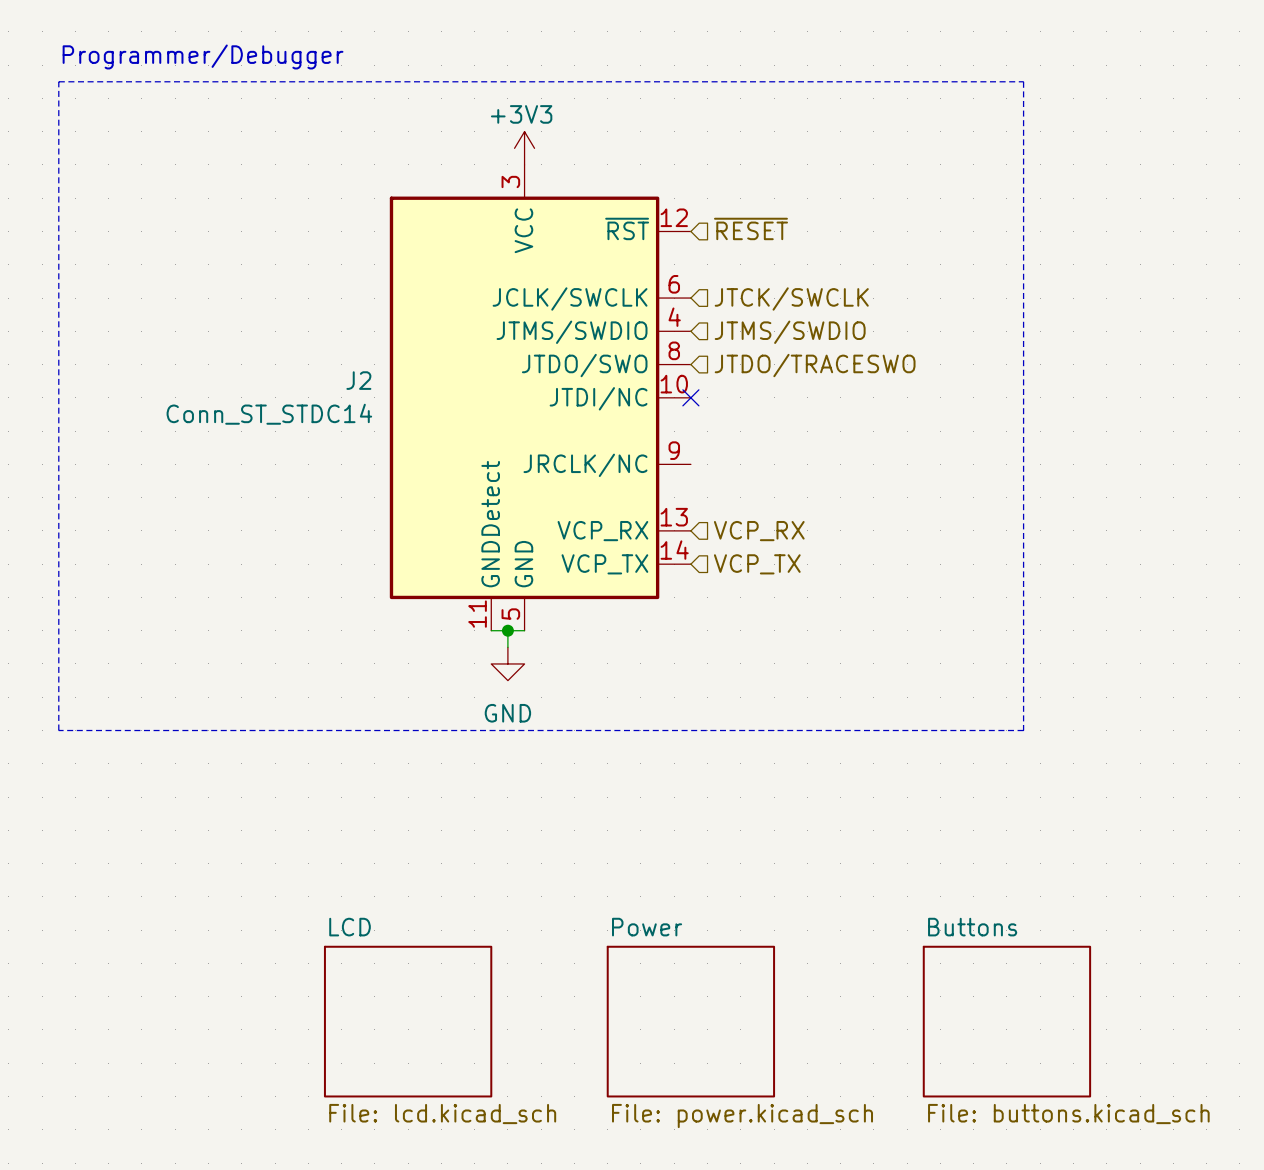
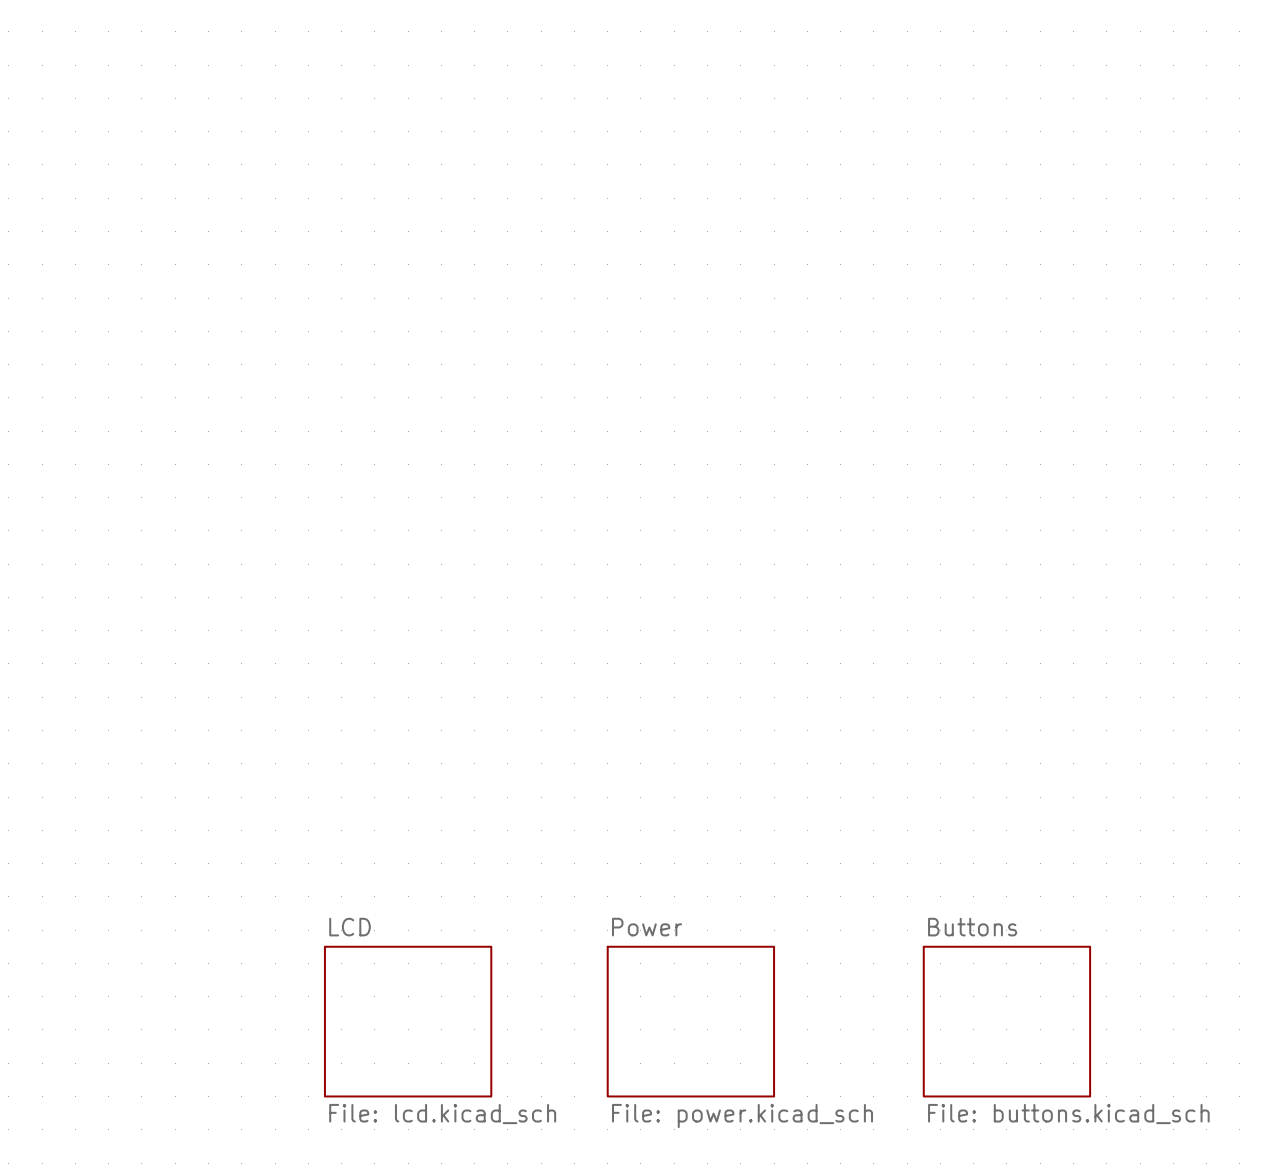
text: Programmer/Debugger (203, 56) -> none
line: (58, 81) (1023, 81) (1023, 730) (58, 730) (58, 81) -> none
power symbol: +3V3 (524, 148) -> none
hierarchical label: ~{RESET} (751, 228) -> none
hierarchical label: JTCK/SWCLK (791, 298) -> none
hierarchical label: JTMS/SWDIO (790, 332) -> none
hierarchical label: JTDO/TRACESWO (815, 365) -> none
J2: Conn_ST_STDC14 (540, 397) -> none
no-connect mark: (690, 397) -> none
hierarchical label: VCP_RX (759, 531) -> none
hierarchical label: VCP_TX (757, 564) -> none
wire: (491, 630) (524, 630) -> none
wire: (507, 630) (507, 647) -> none
junction: (507, 630) -> none
power symbol: GND (507, 663) -> none

